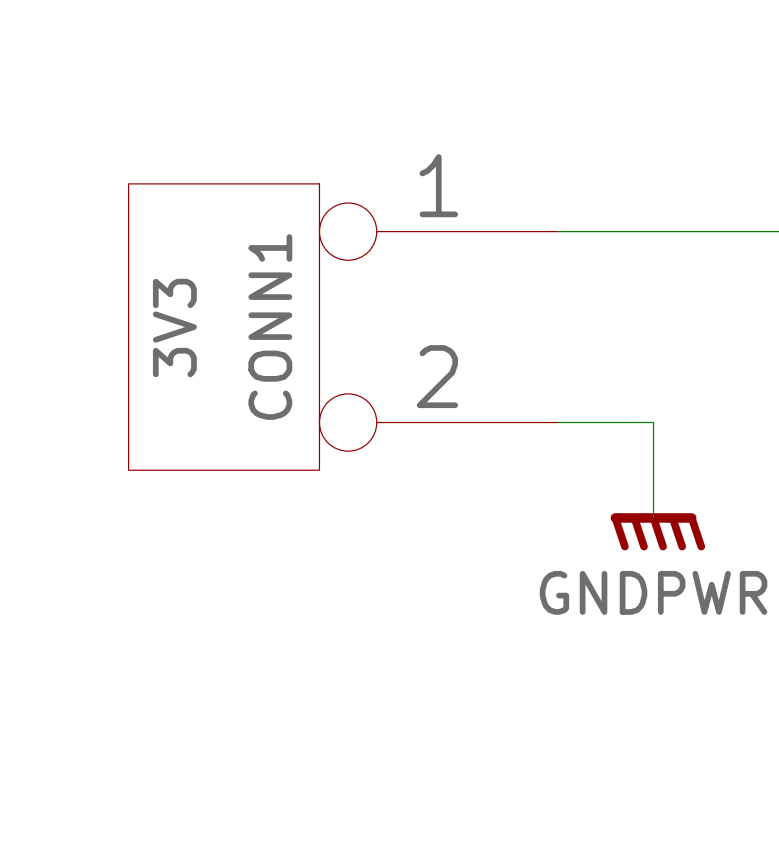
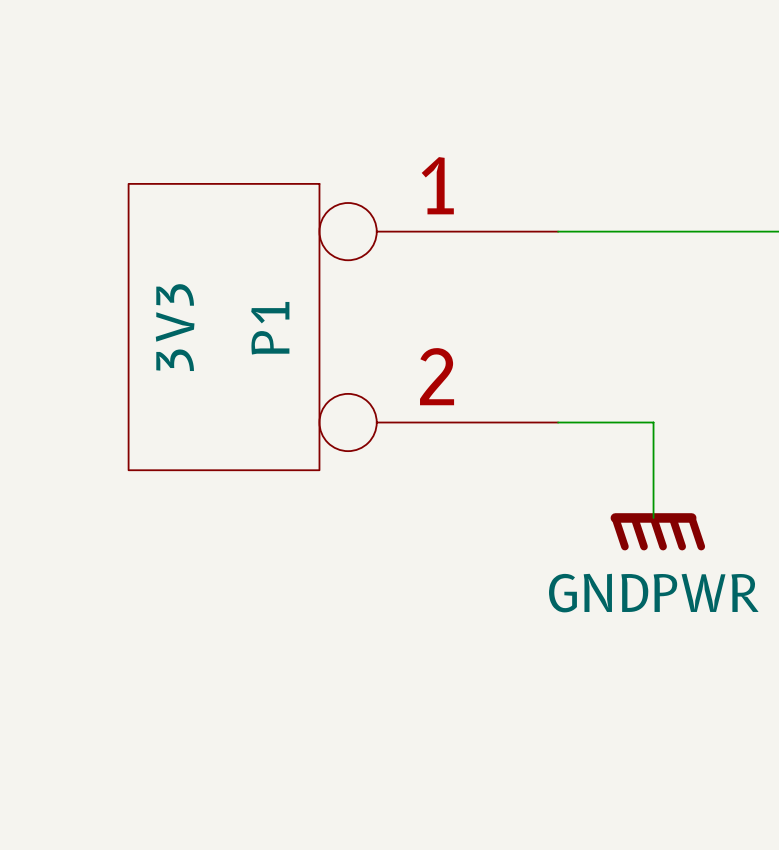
CONN1 name: CONN1 (270, 327) -> P1 (270, 328)

